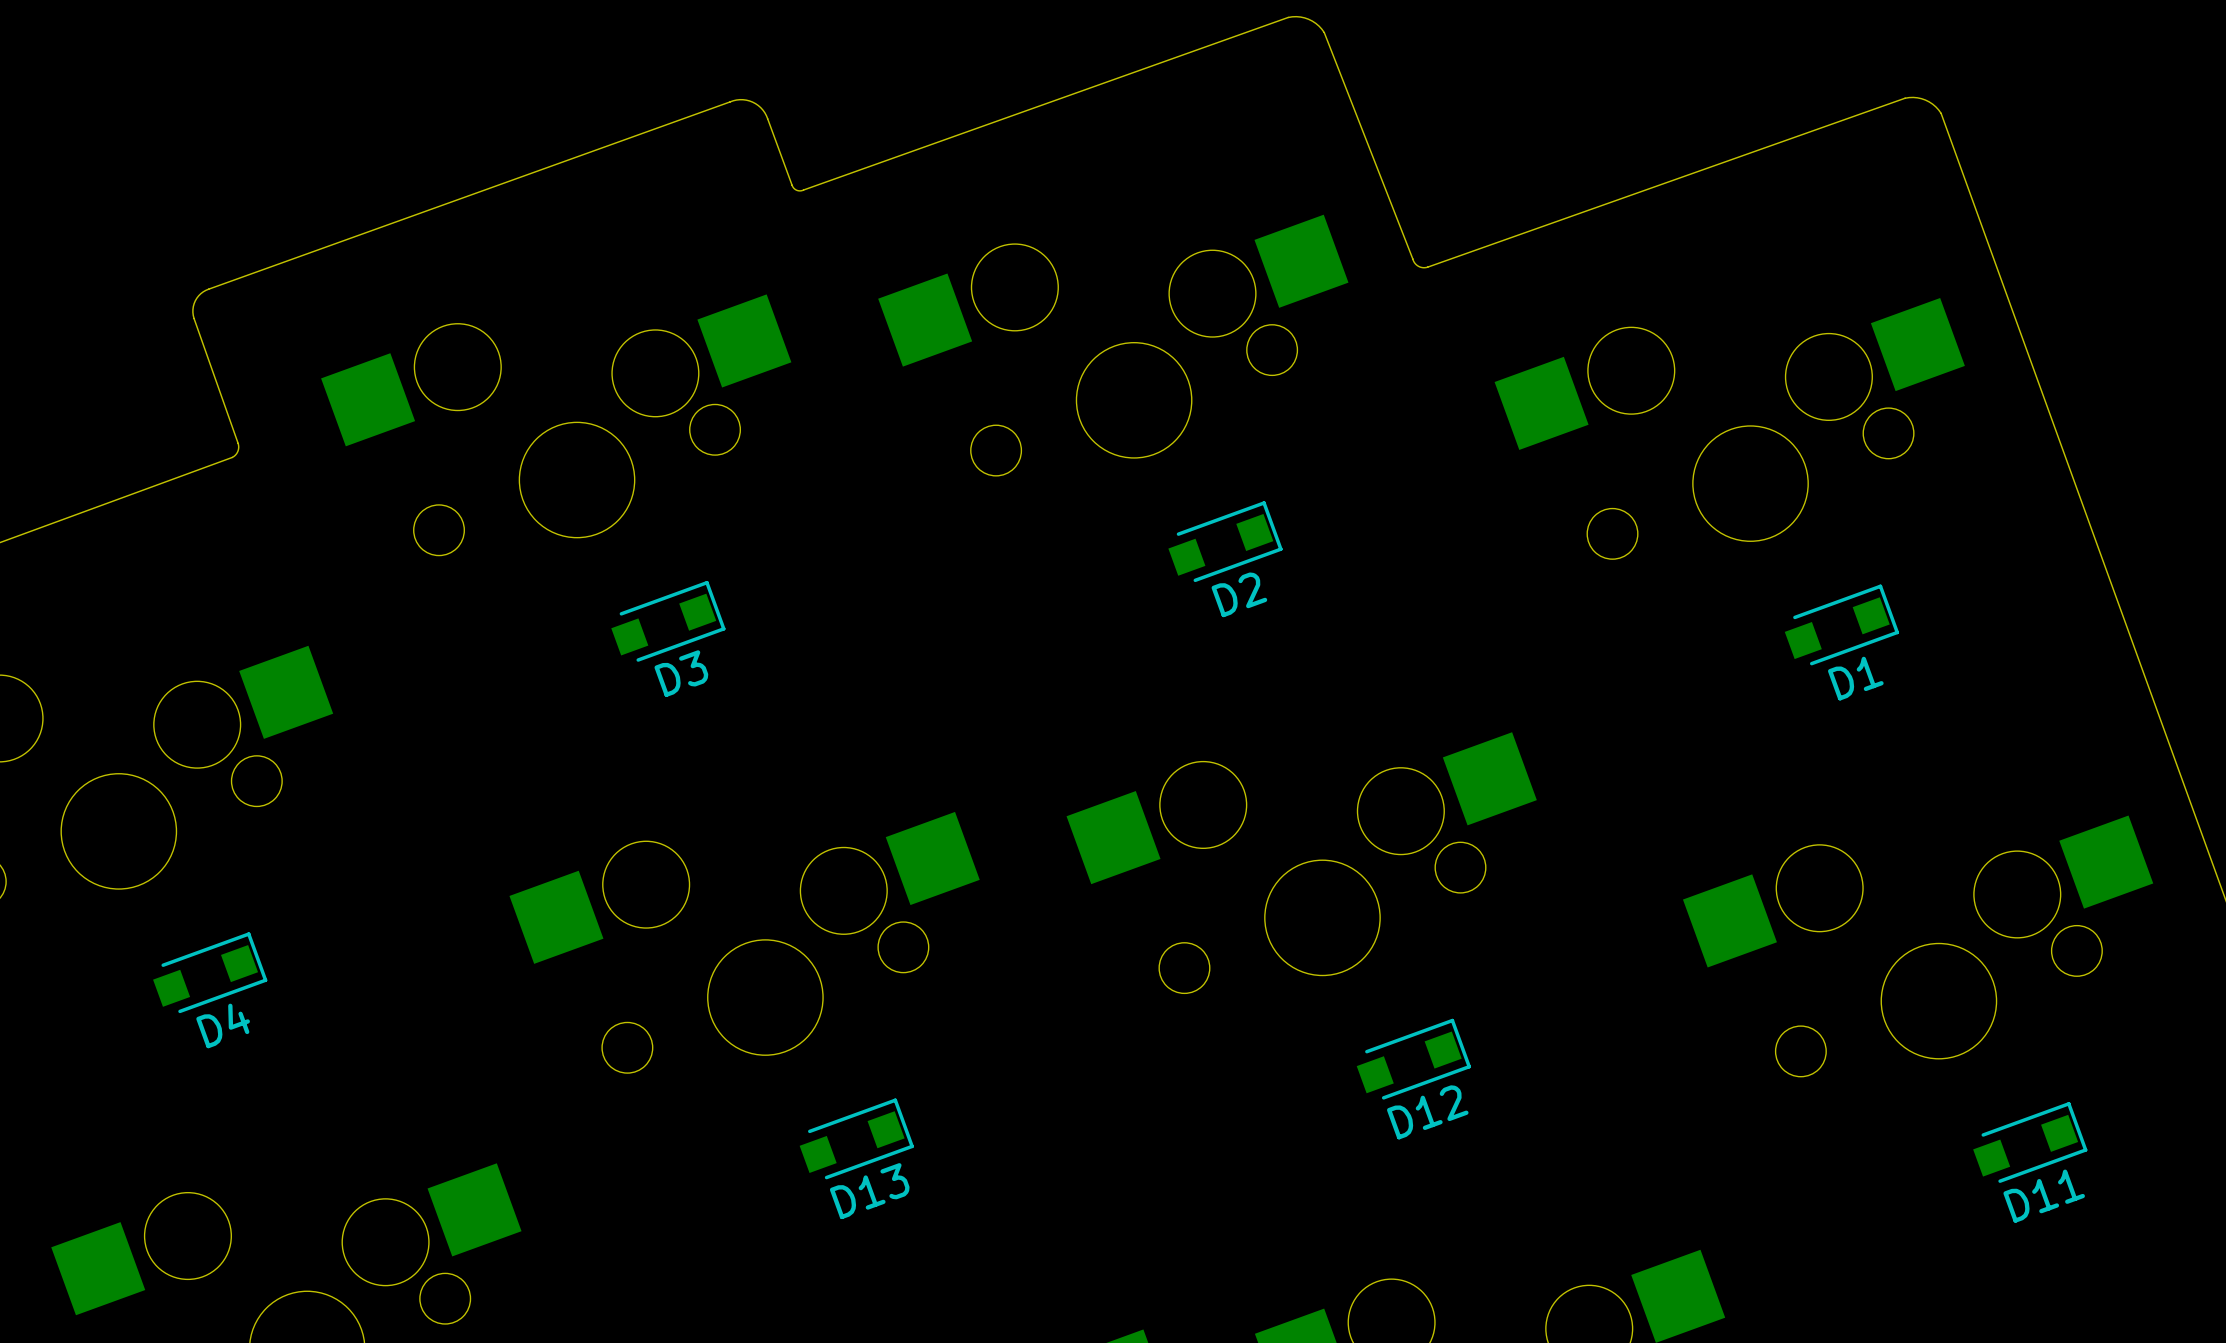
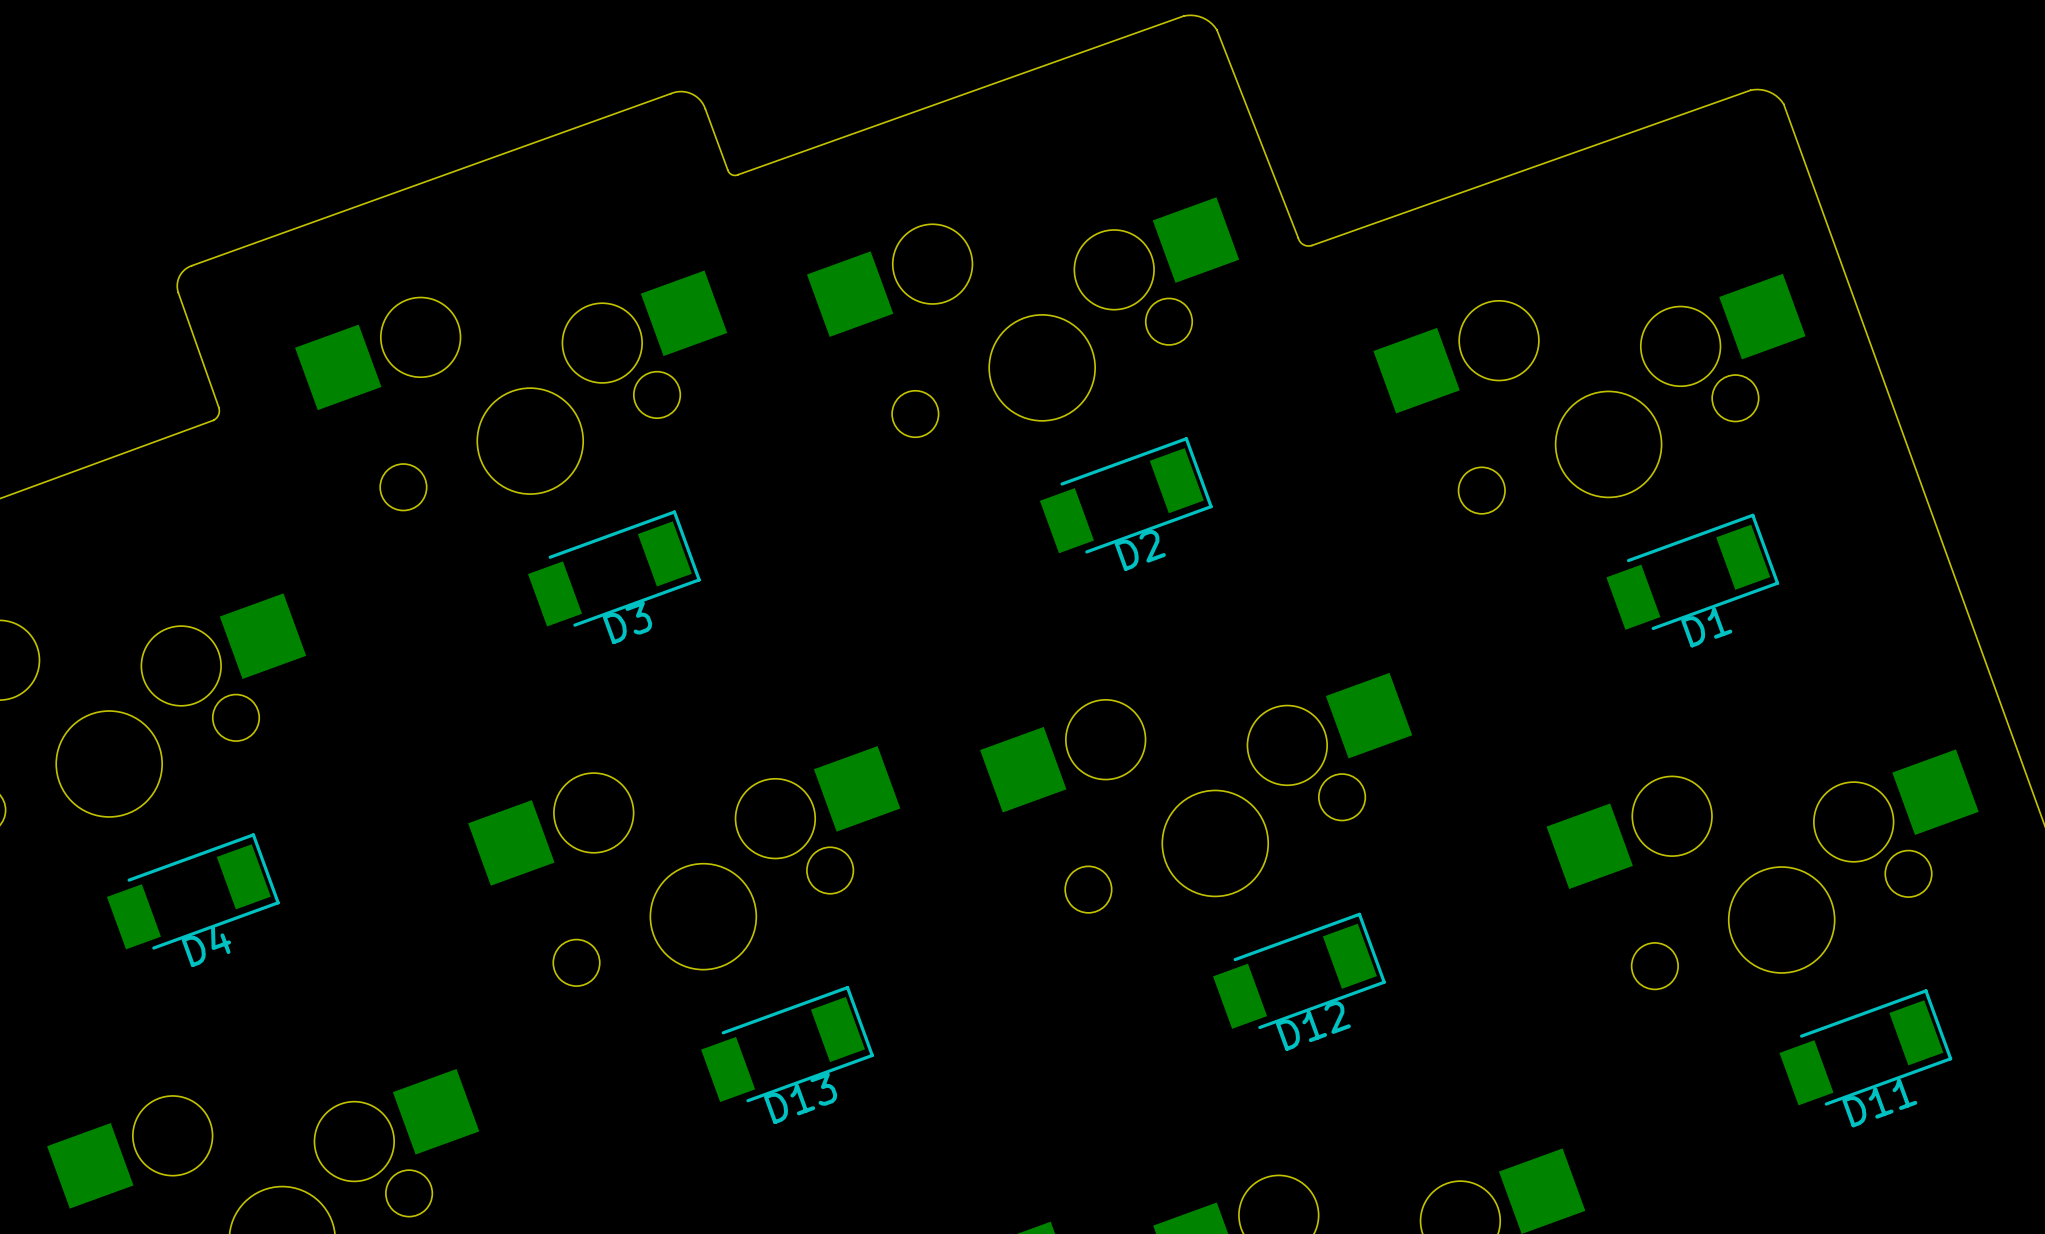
D2 footprint: [1168, 501, 1283, 583] -> [1039, 437, 1213, 554]
D3 footprint: [611, 580, 726, 662] -> [528, 510, 701, 627]
D1 footprint: [1784, 584, 1900, 666] -> [1606, 513, 1780, 631]
D4 footprint: [153, 932, 268, 1014] -> [106, 833, 280, 950]
D12 footprint: [1356, 1018, 1471, 1100] -> [1213, 912, 1386, 1030]
D13 footprint: [799, 1098, 914, 1180] -> [701, 985, 874, 1103]
D11 footprint: [1973, 1102, 2088, 1183] -> [1779, 989, 1953, 1106]

